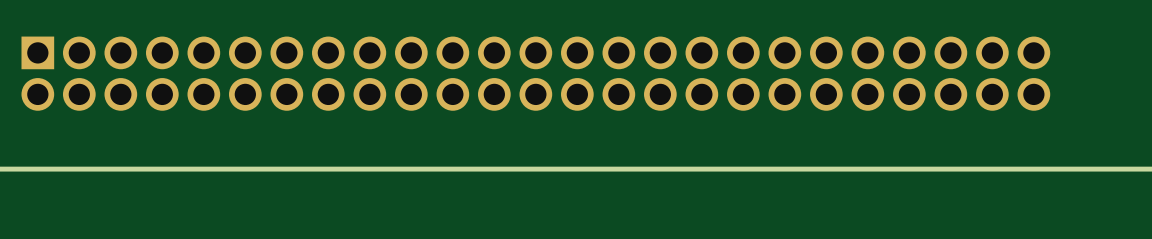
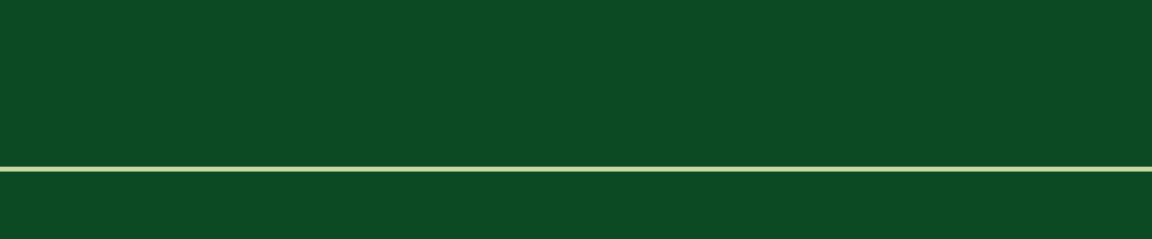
part: (535, 73) -> none

